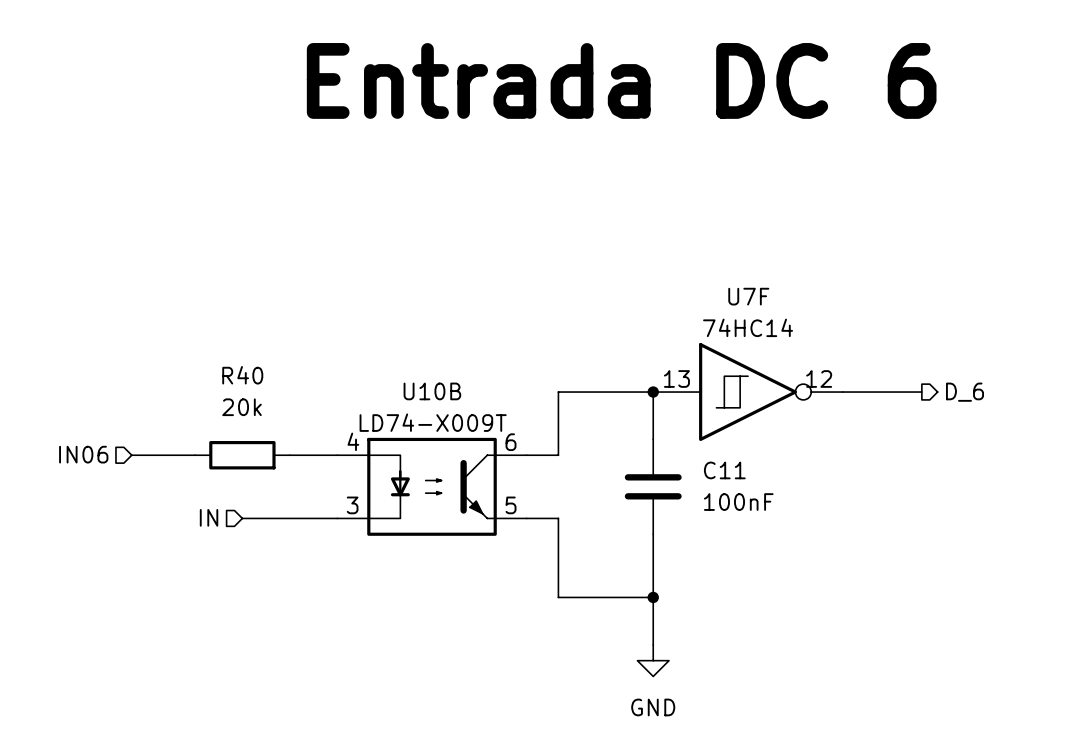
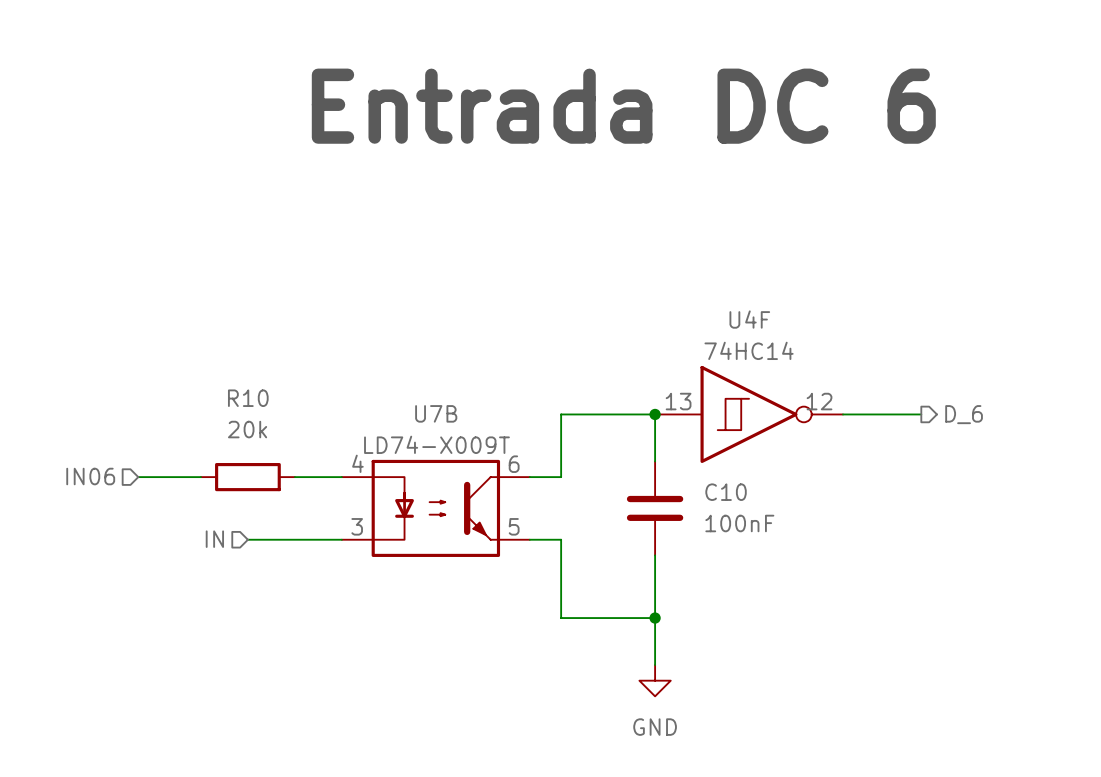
U7F name: U7F (748, 296) -> U4F (749, 319)
R40 name: R40 (242, 375) -> R10 (248, 398)
U10B name: U10B (432, 391) -> U7B (436, 413)
C11 name: C11 (724, 470) -> C10 (726, 492)

